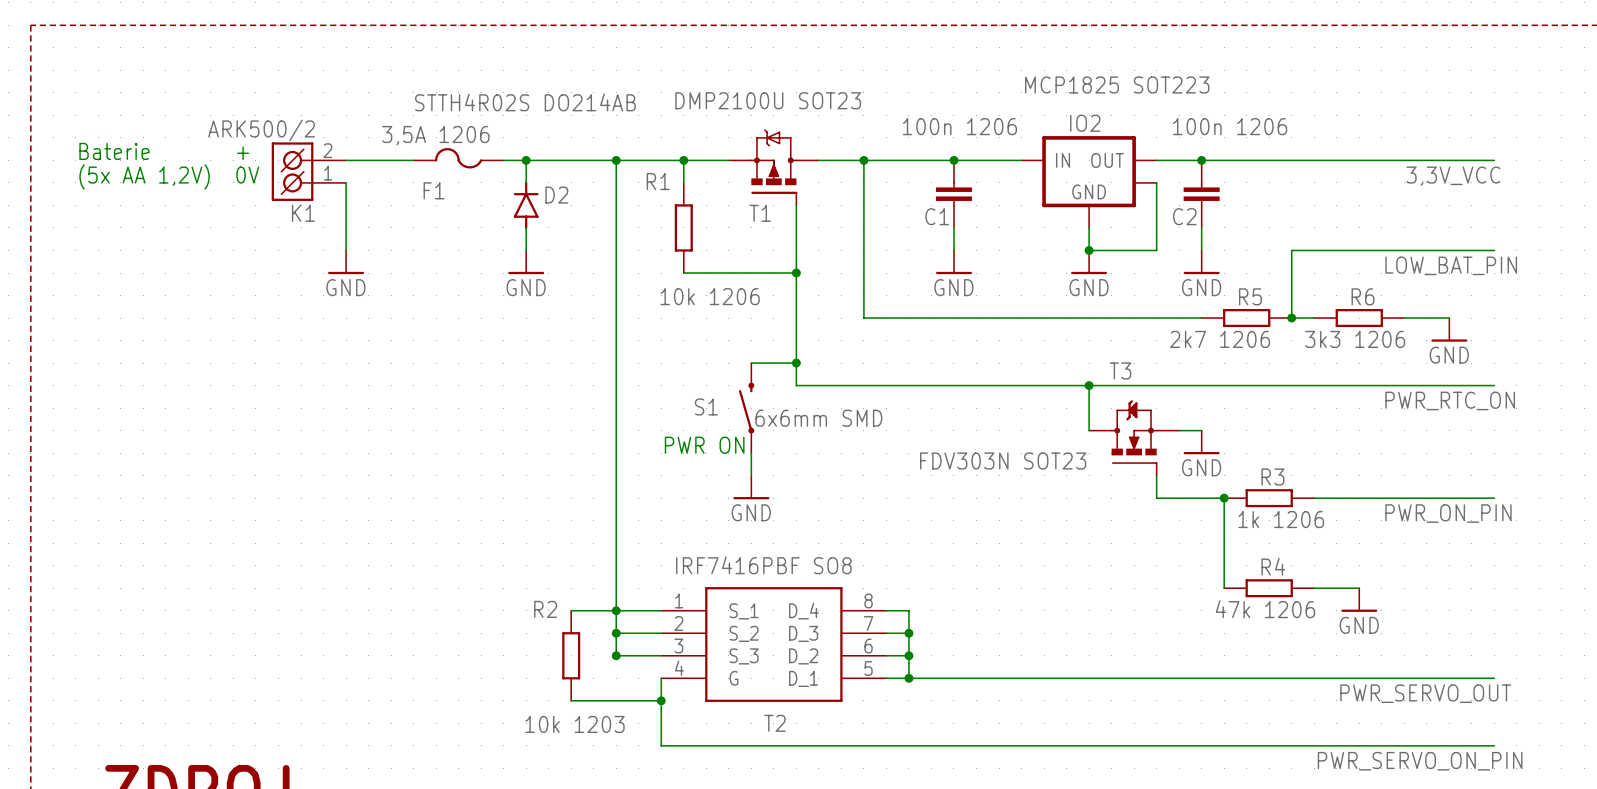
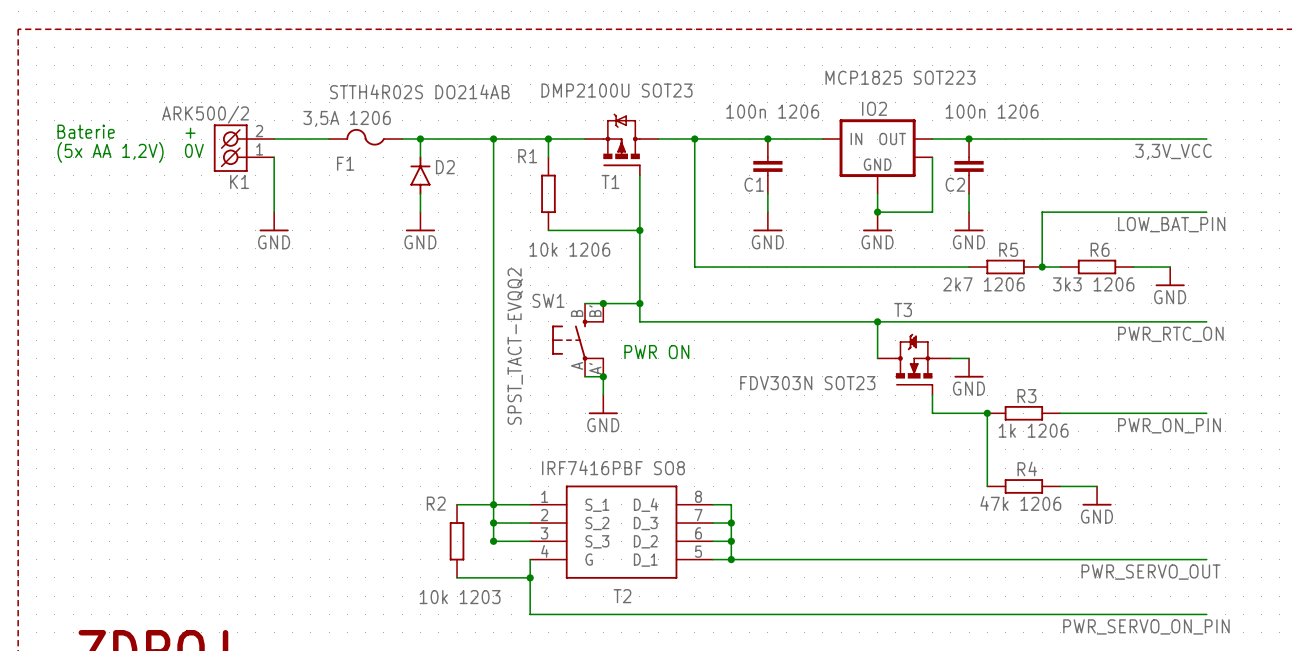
wire: none -> (585, 303) (603, 303)
junction: none -> (603, 303)
SW1: none -> SPST_TACT-EVQQ2 (577, 340)
S1: 6x6mm SMD (746, 408) -> none
text position: PWR ON (704, 445) -> PWR ON (656, 352)
wire: none -> (585, 376) (603, 376)
junction: none -> (603, 376)

